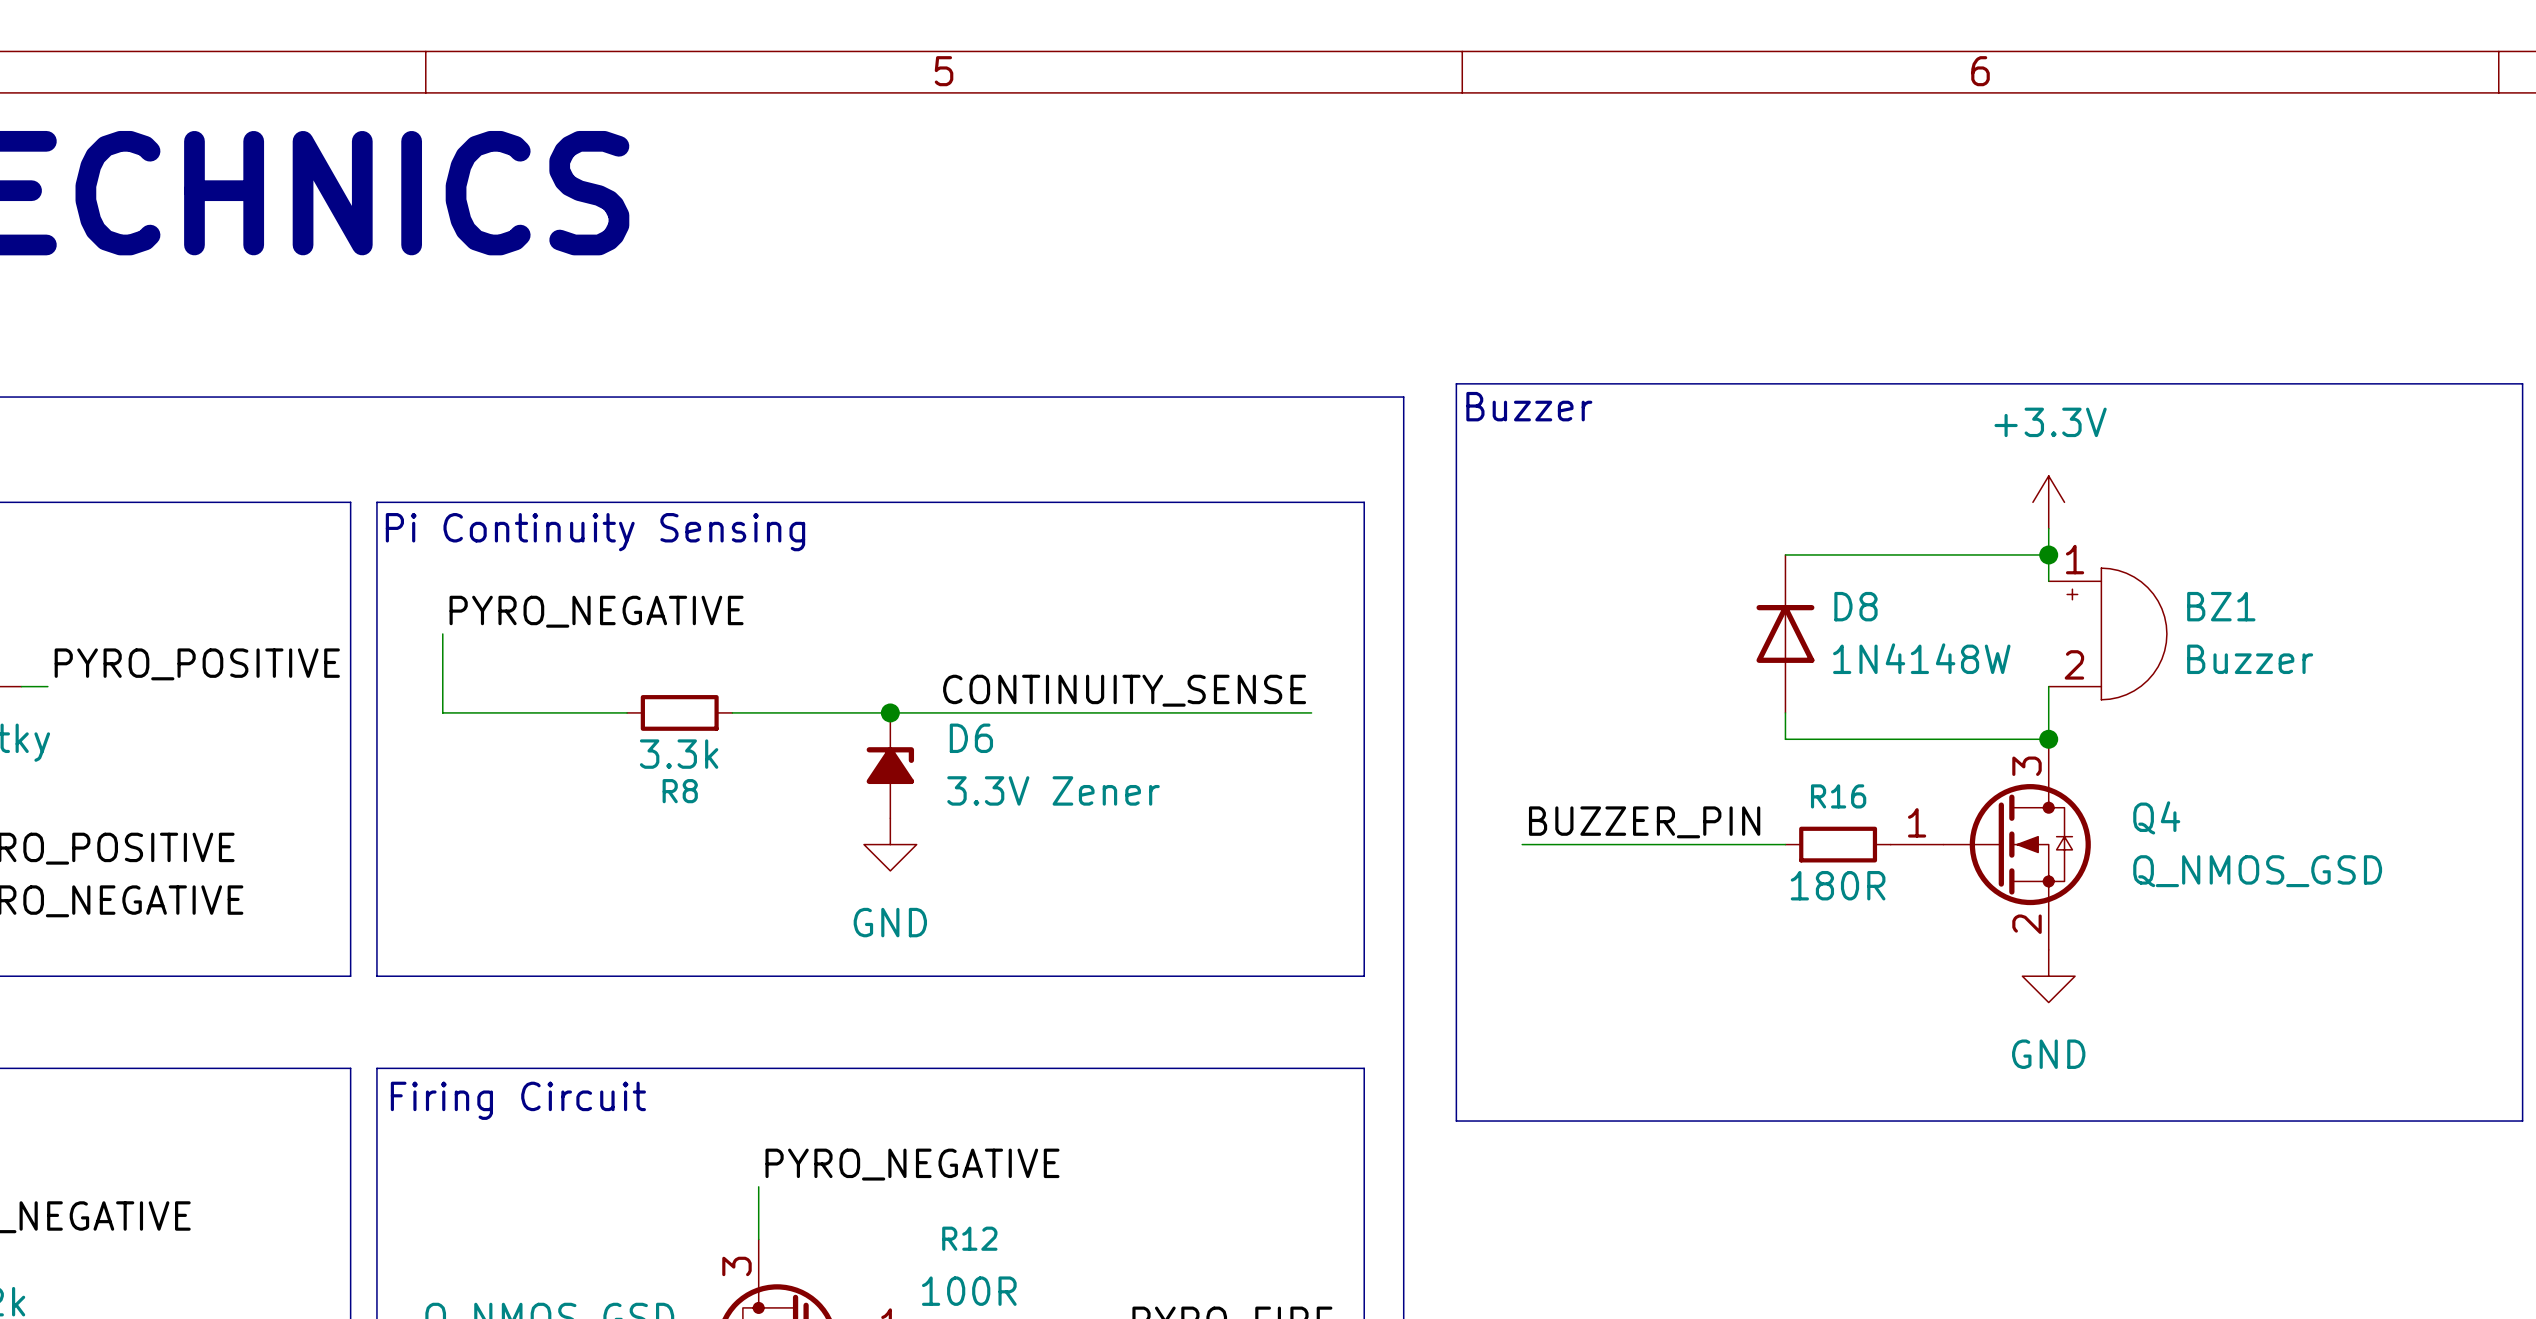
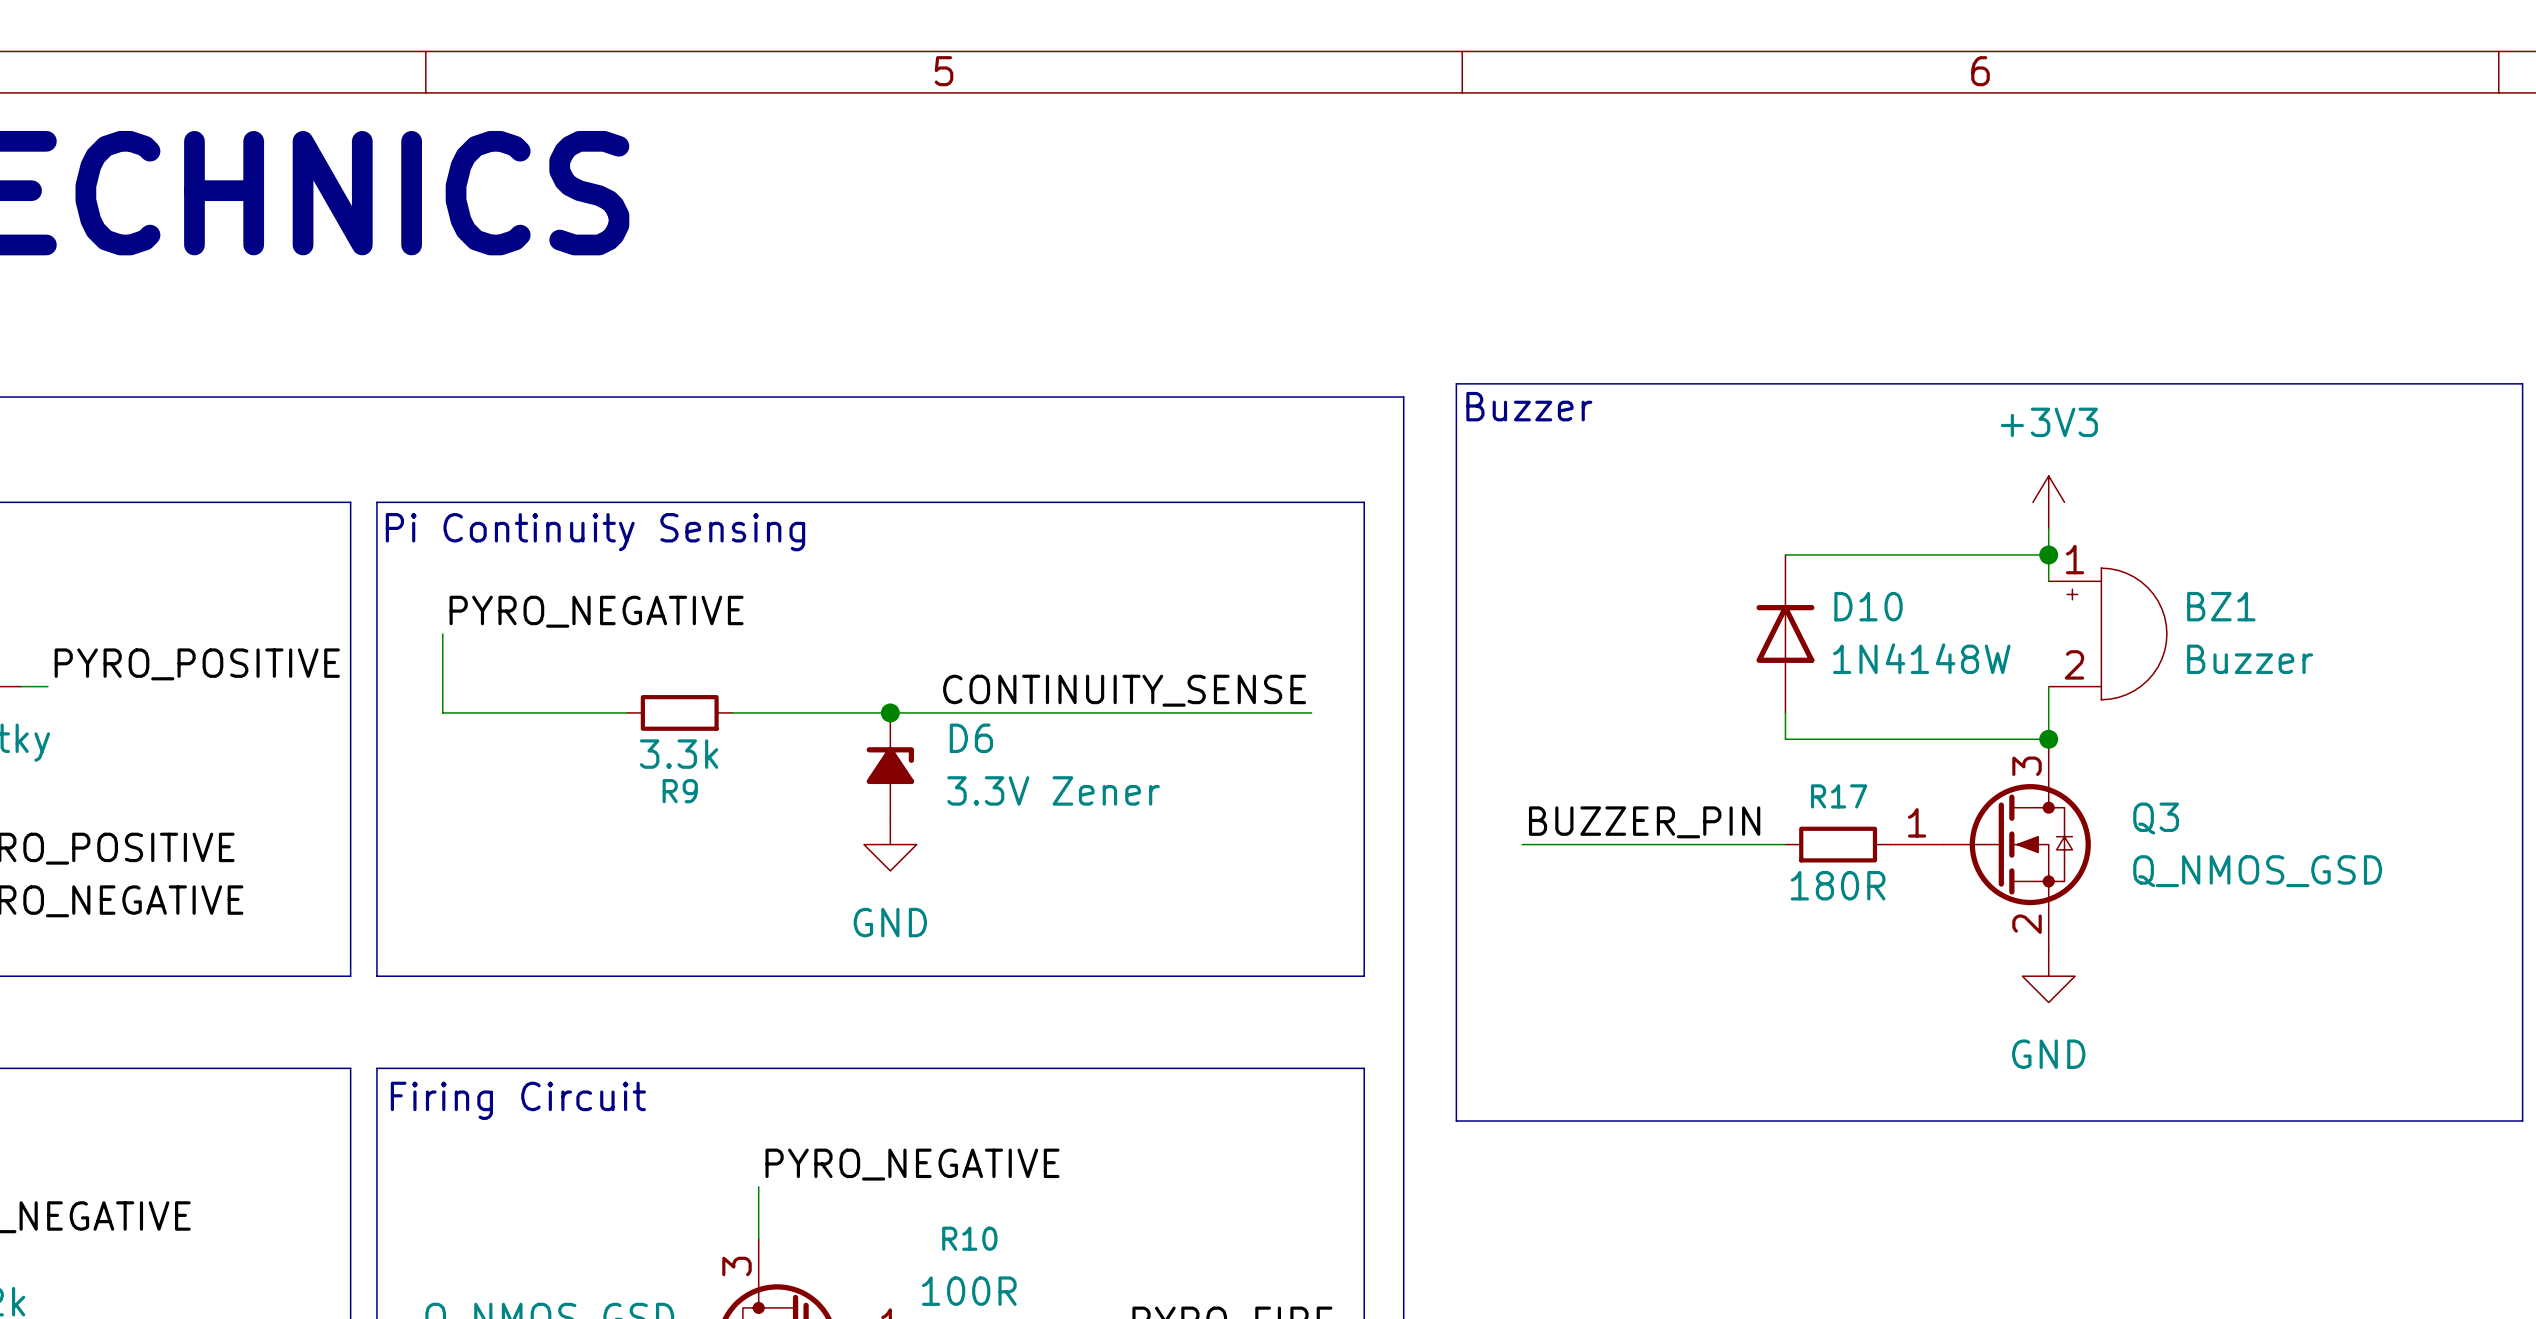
power symbol: +3.3V (2048, 502) -> +3V3 (2048, 502)
D8 name: D8 (1855, 606) -> D10 (1868, 606)
R8 name: R8 (680, 791) -> R9 (680, 791)
R16 name: R16 (1838, 796) -> R17 (1839, 796)
Q4 name: Q4 (2156, 817) -> Q3 (2156, 818)
R12 name: R12 (969, 1238) -> R10 (969, 1238)

